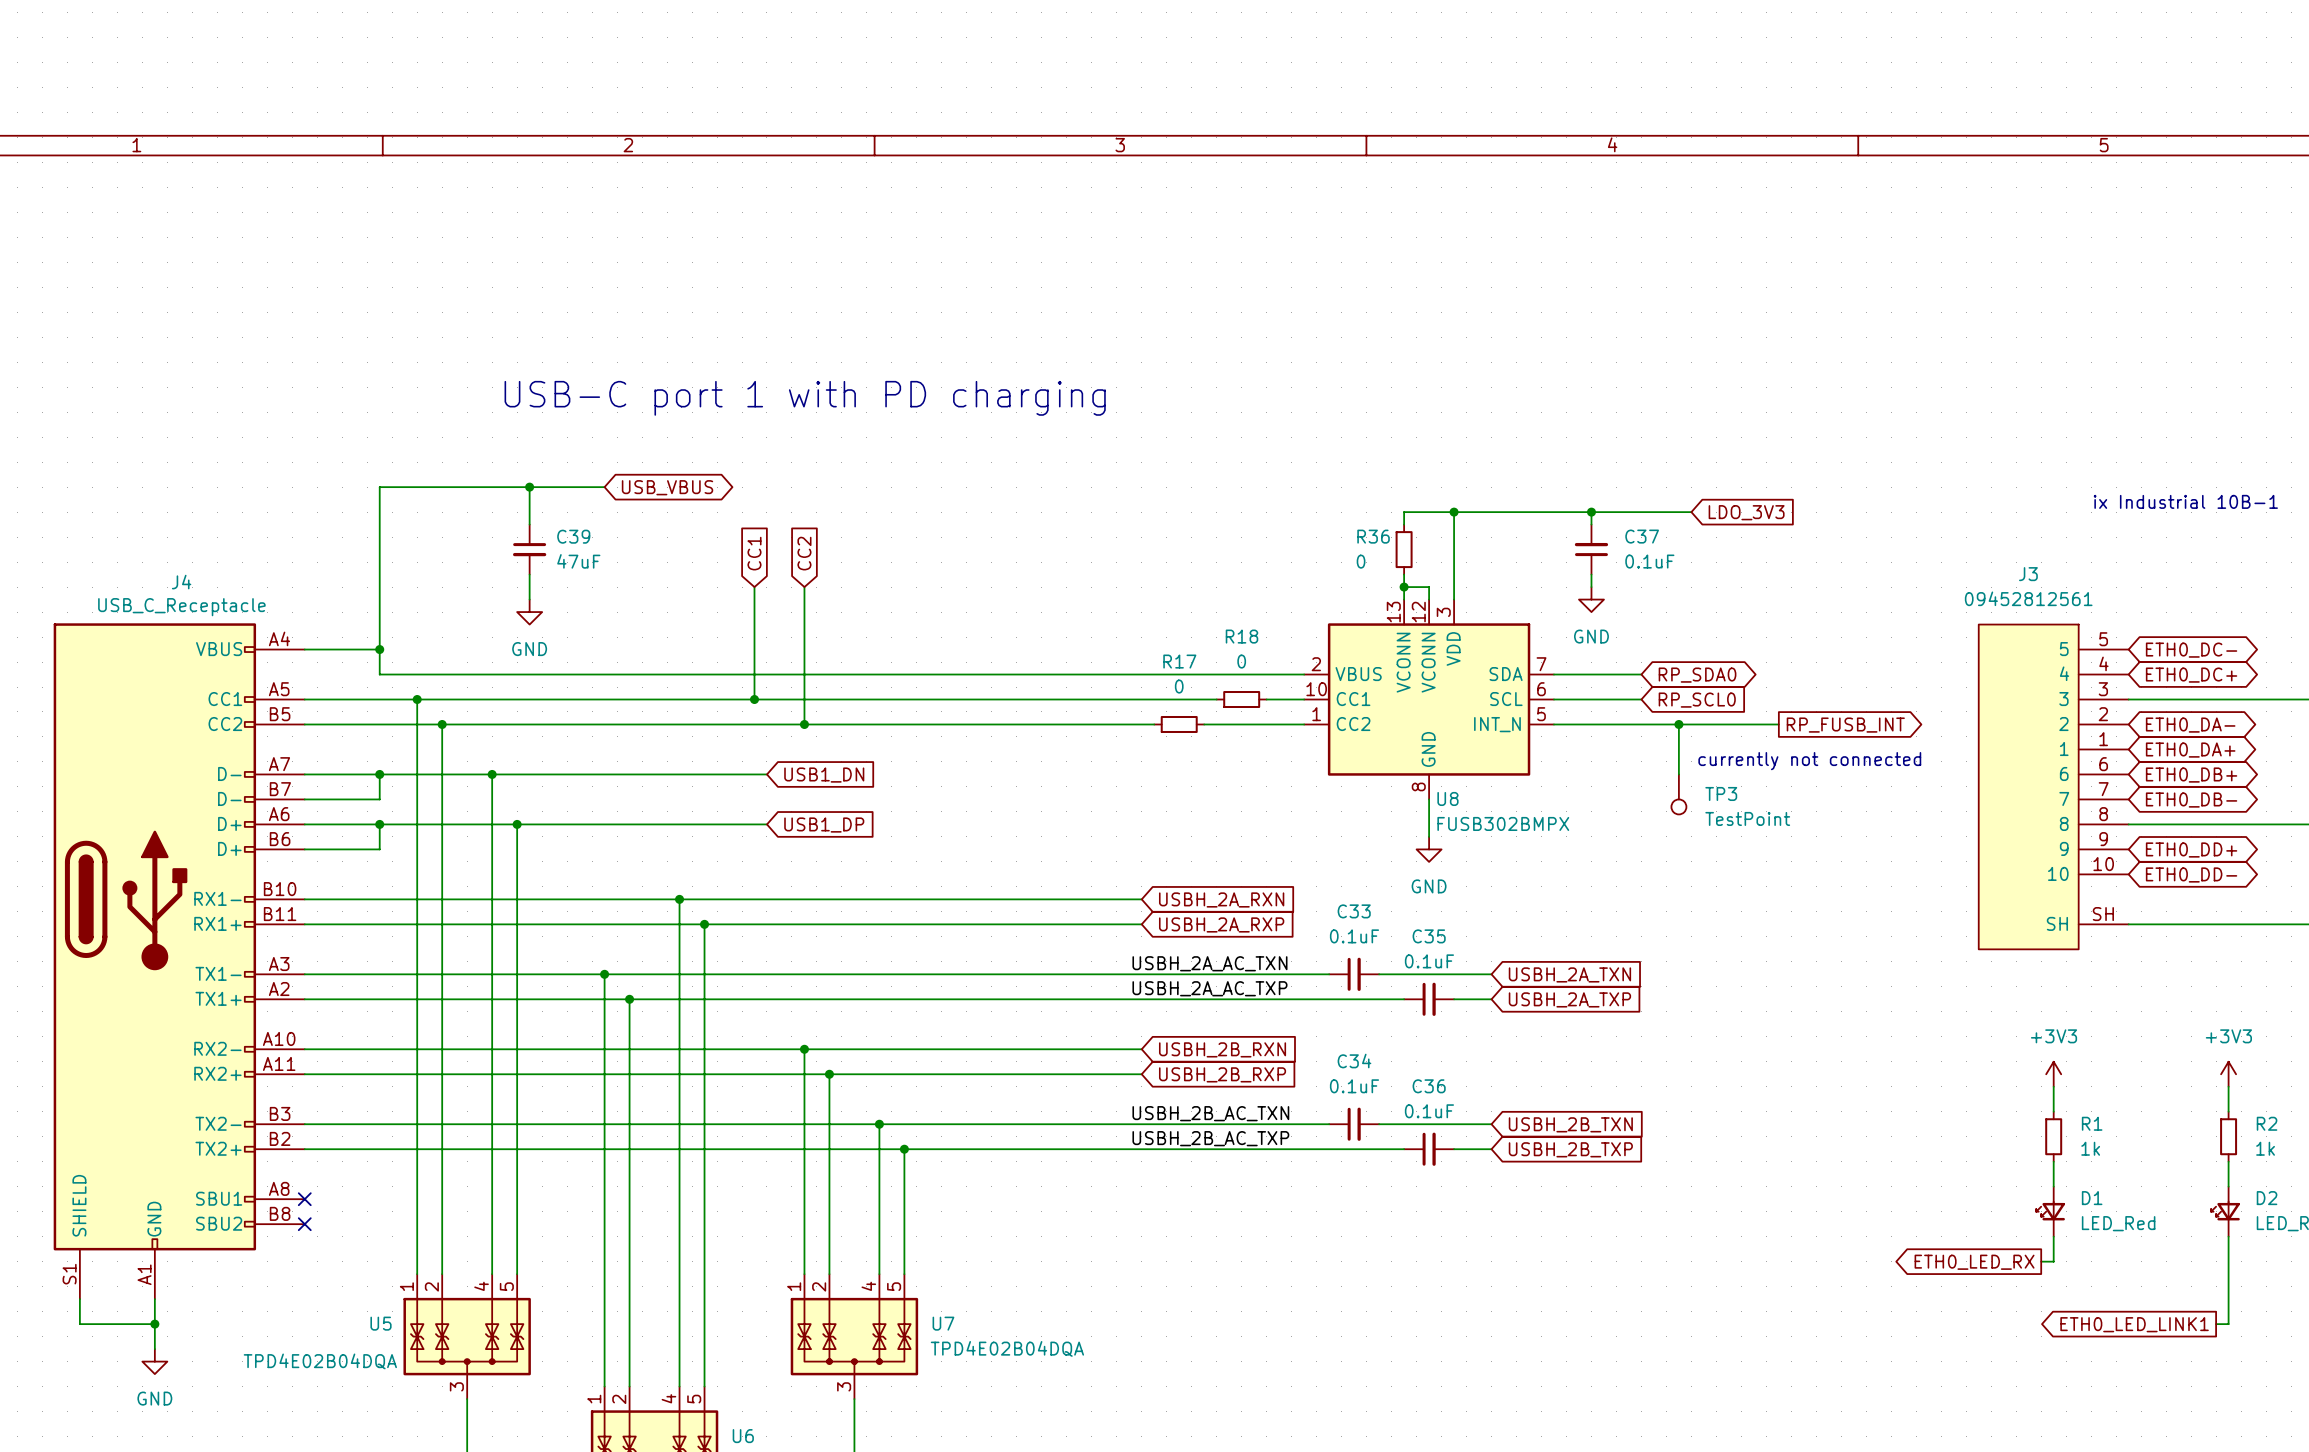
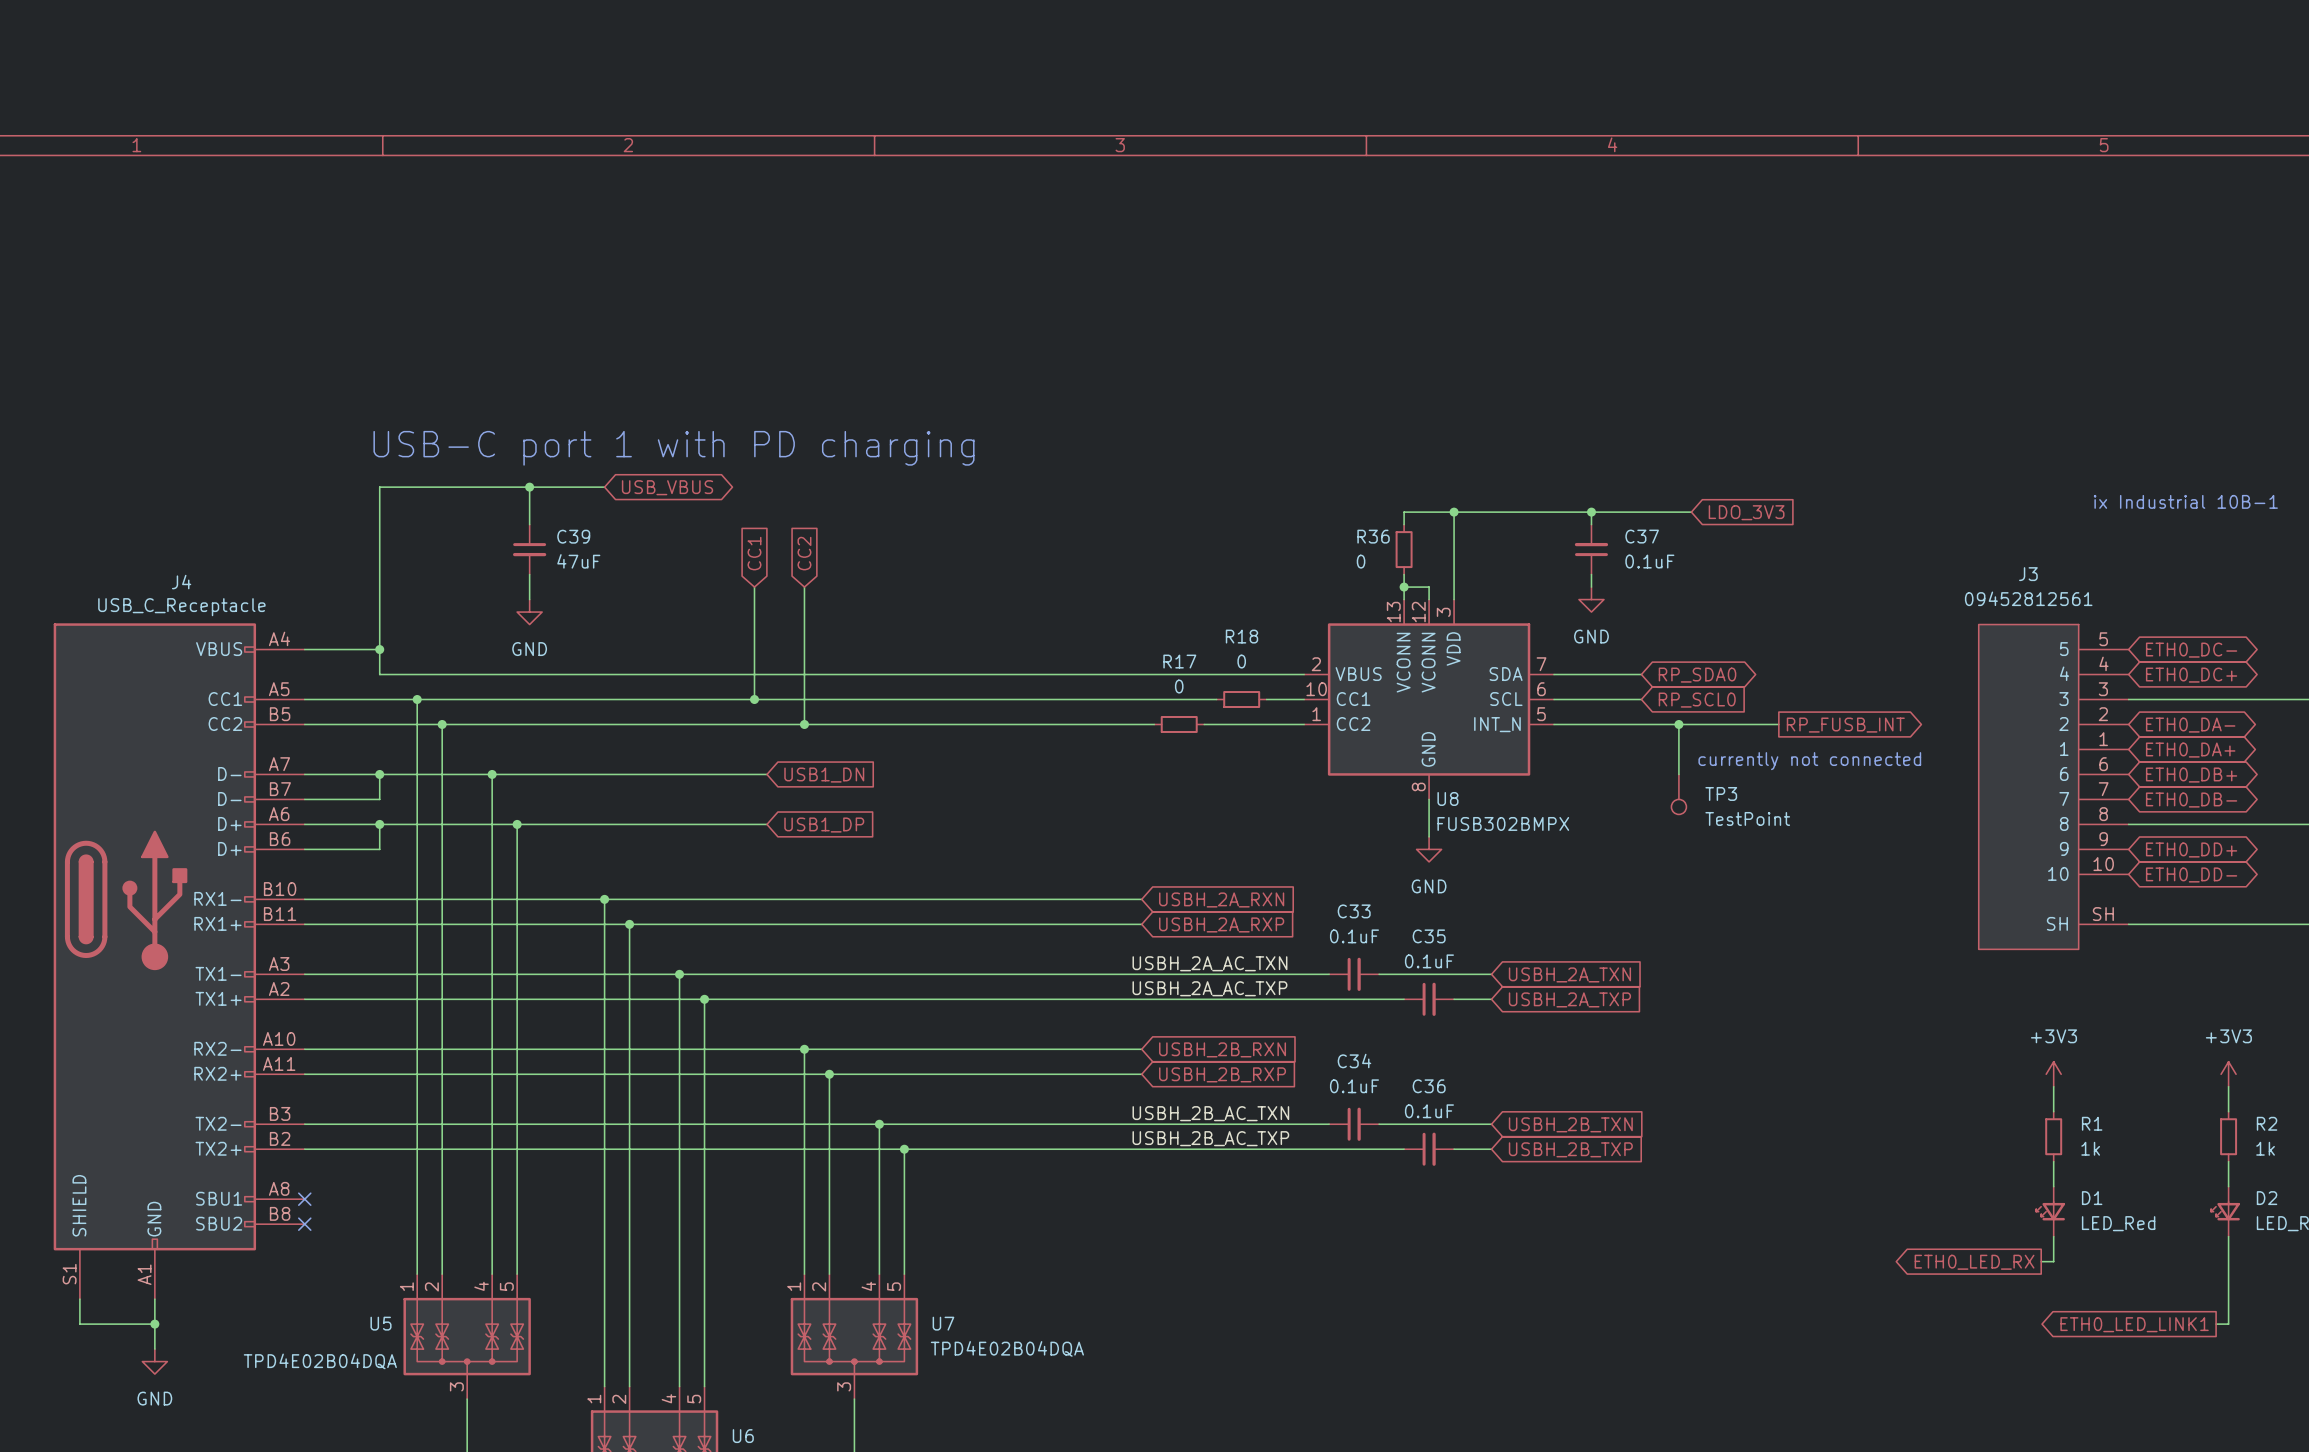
text position: USB-C port 1 with PD charging (805, 398) -> USB-C port 1 with PD charging (673, 448)
junction: none -> (604, 899)
wire: (679, 899) (679, 974) -> (629, 924) (629, 999)
junction: (679, 899) -> none
junction: none -> (629, 924)
wire: (704, 924) (704, 999) -> (604, 899) (604, 974)
junction: (704, 924) -> none
junction: (604, 974) -> none
junction: none -> (679, 974)
junction: (629, 999) -> none
junction: none -> (704, 999)

